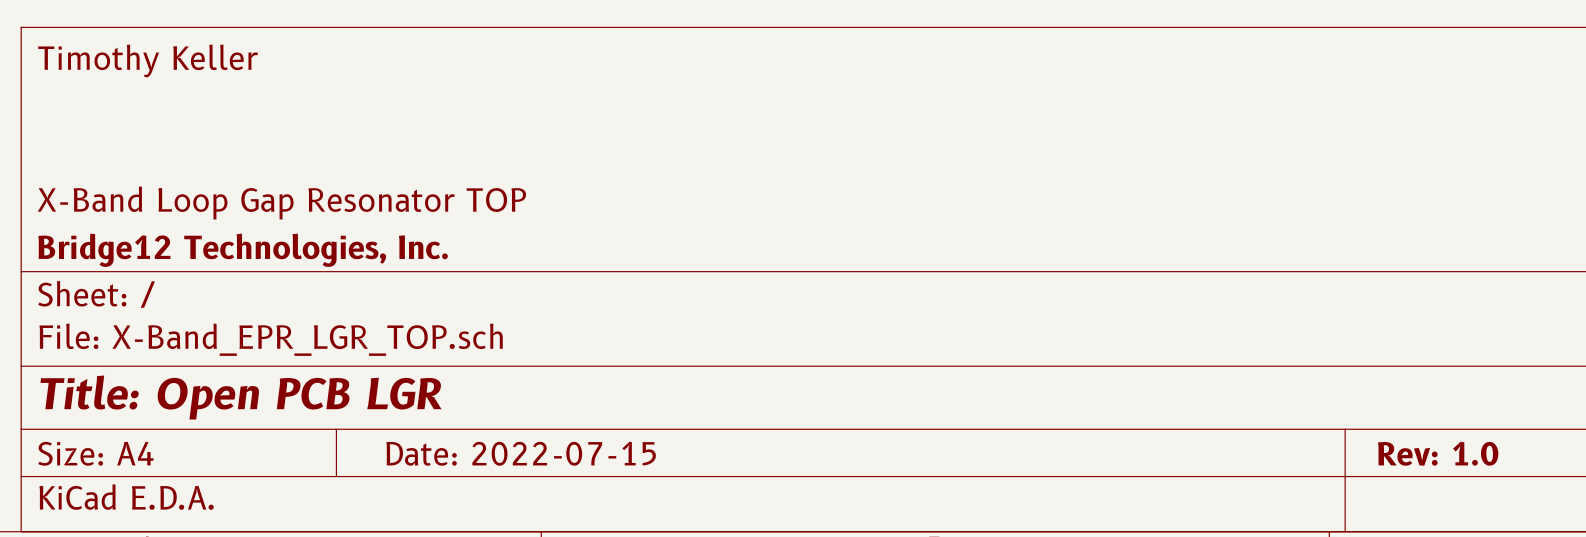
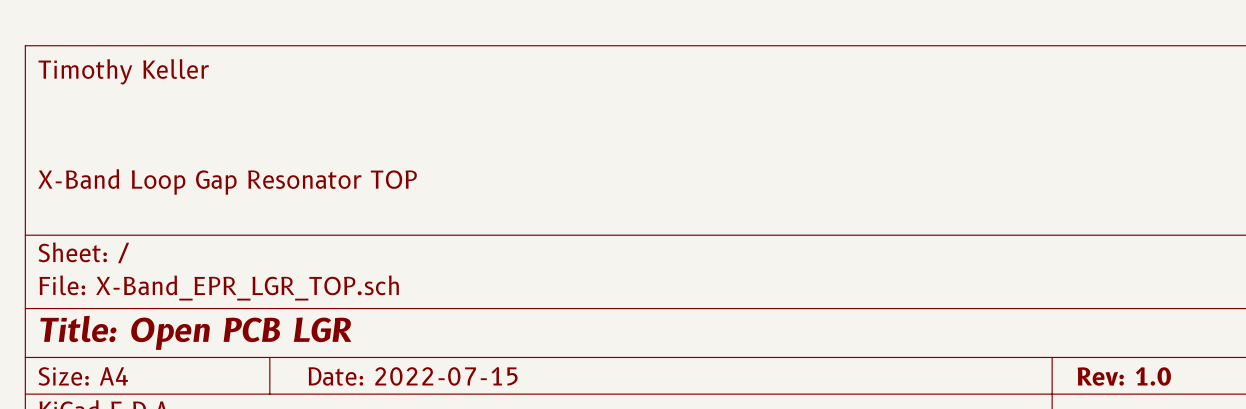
title block: Bridge12 Technologies, Inc. (243, 250) -> none

